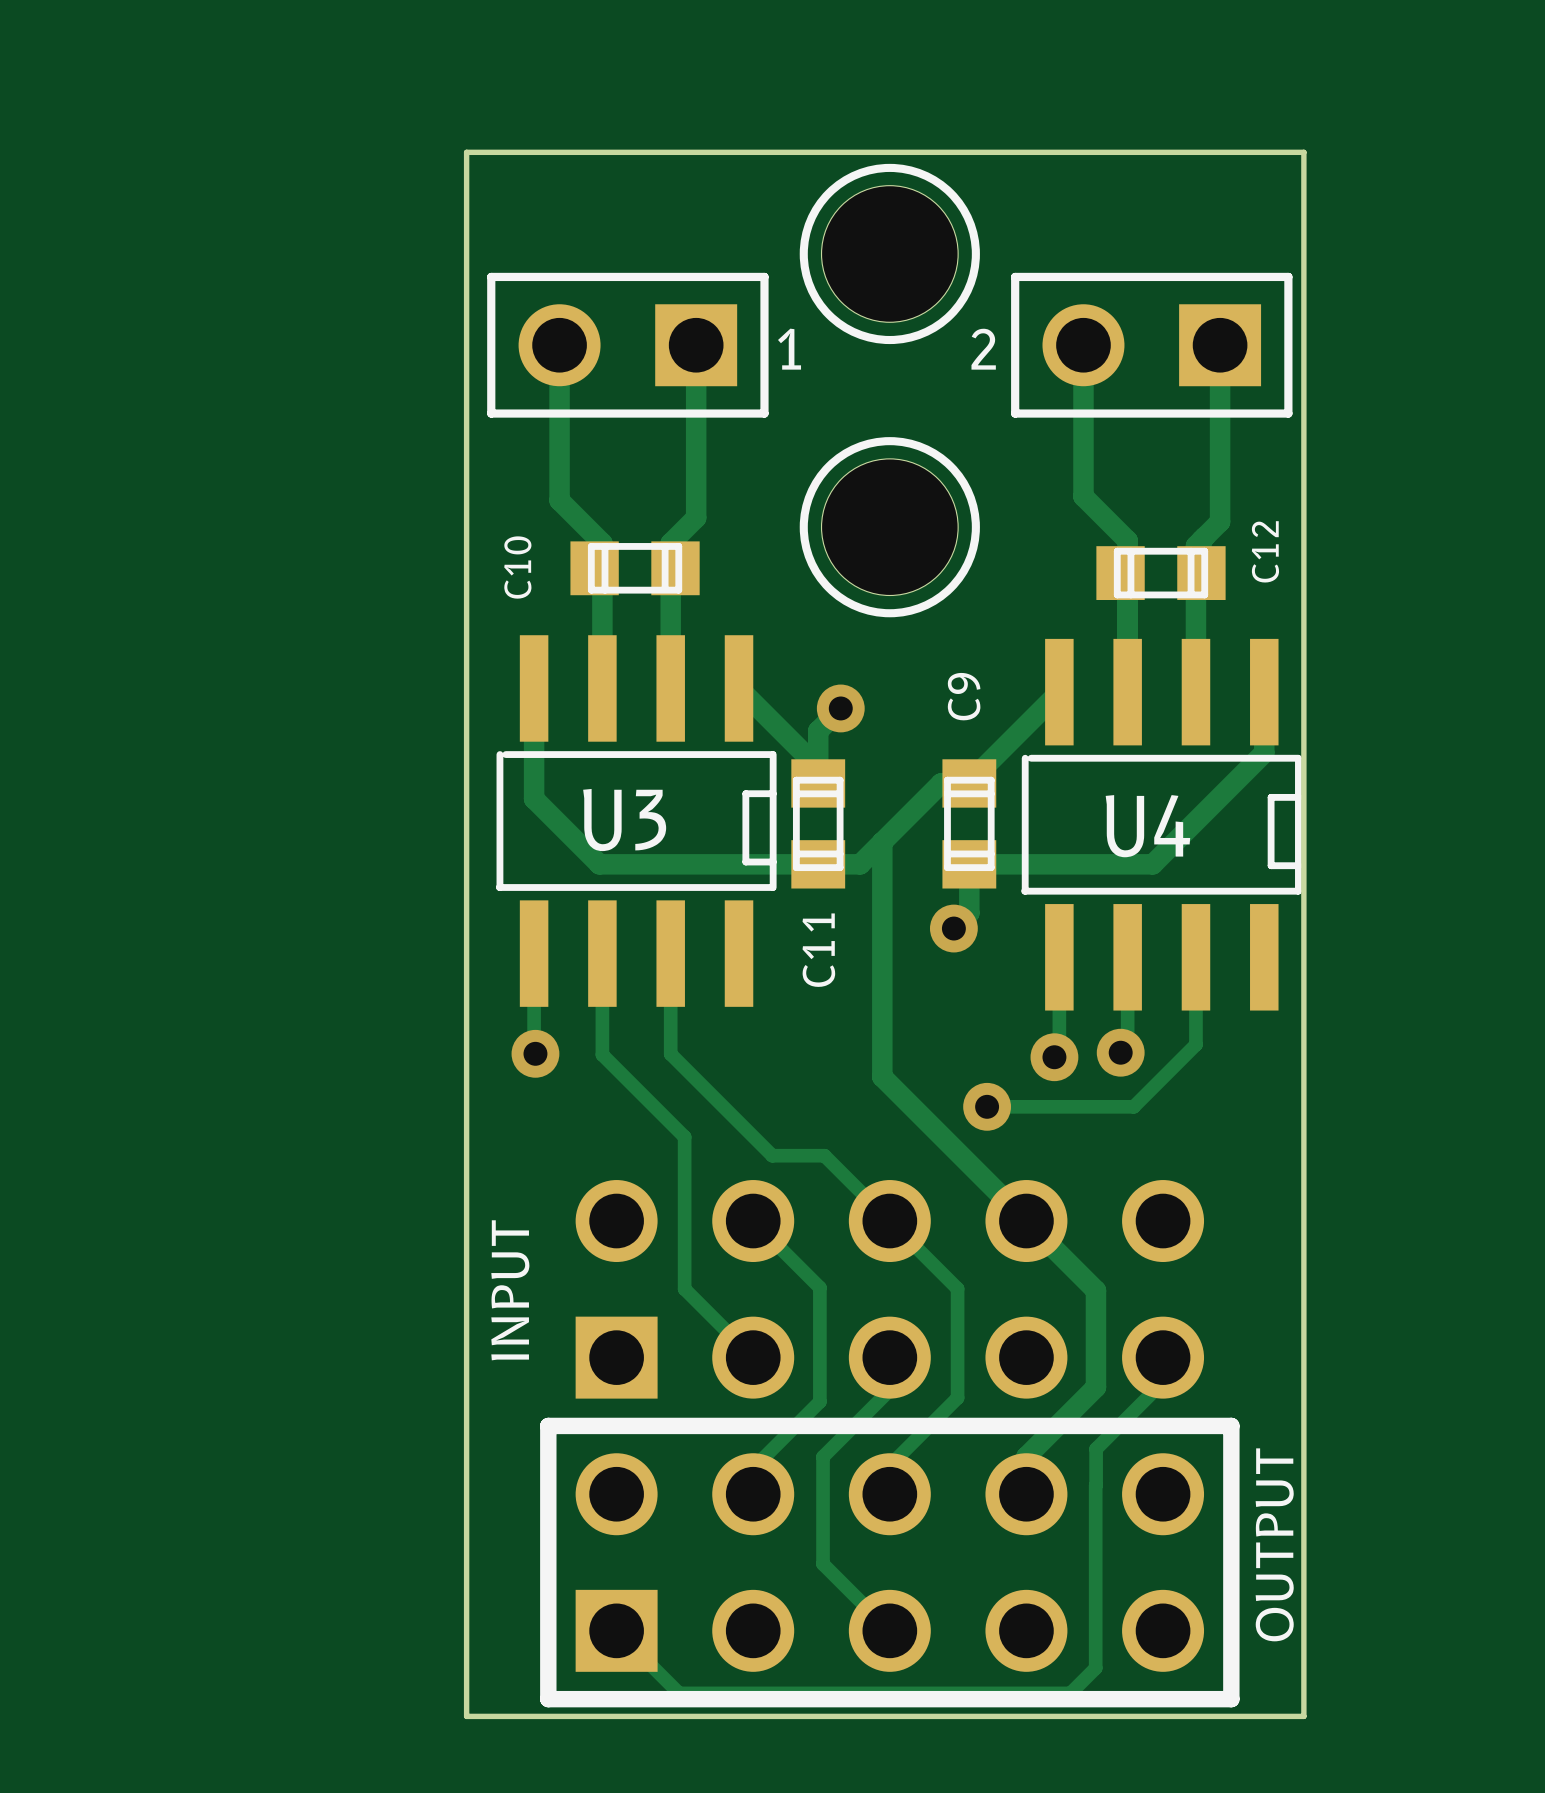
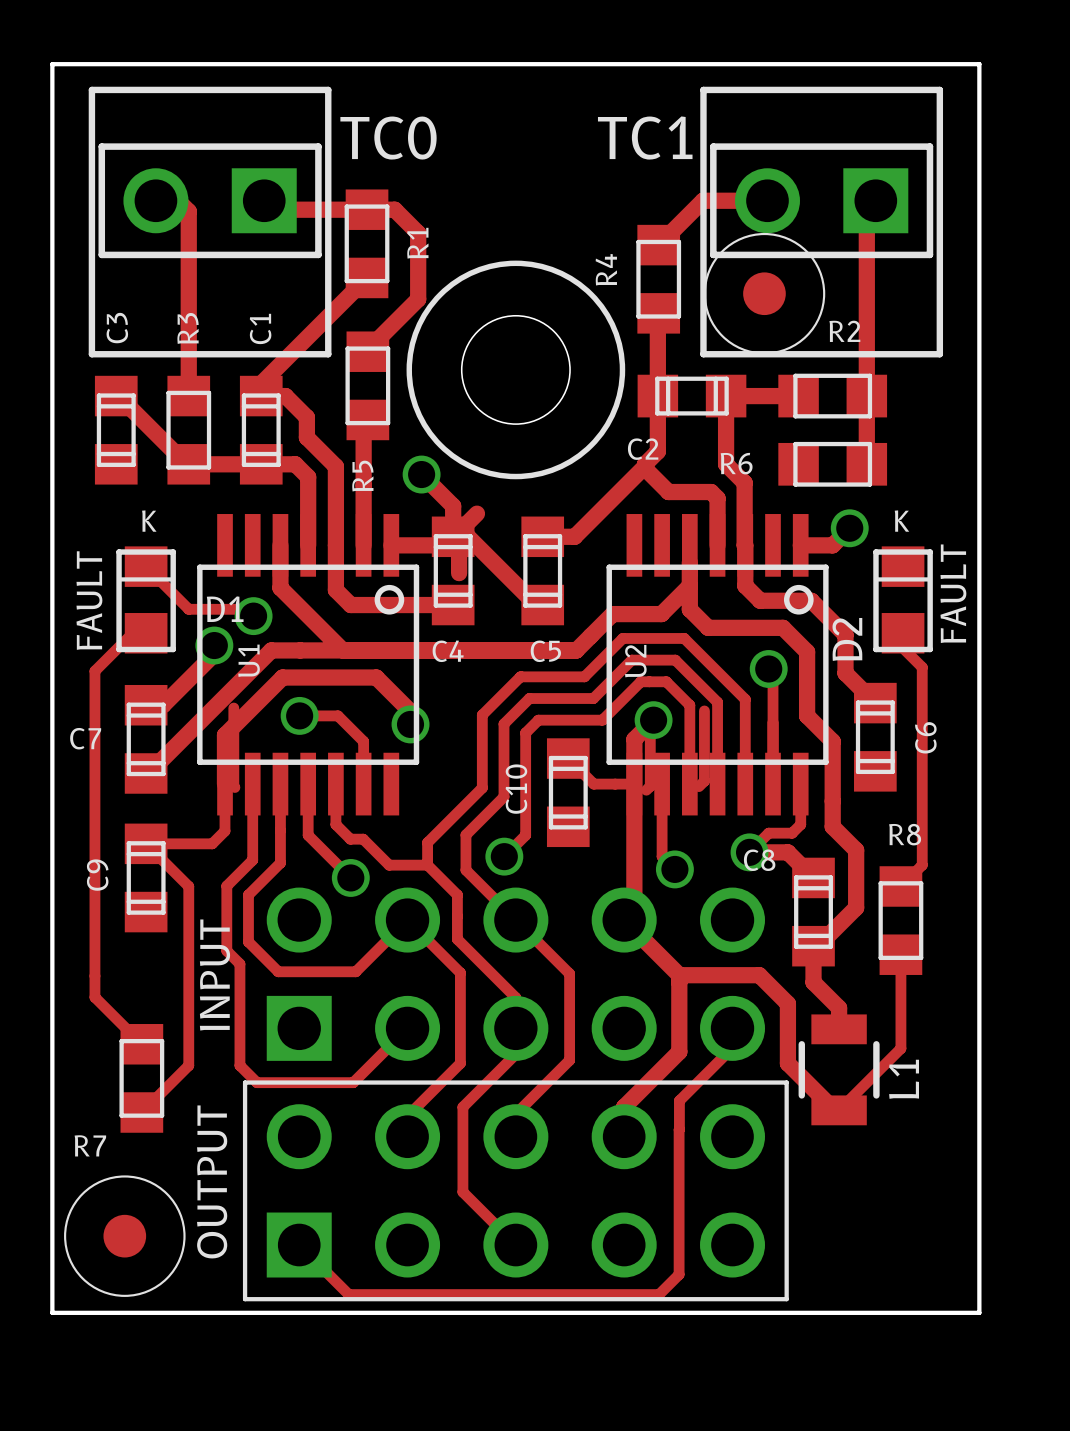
text: none -> TC0 (388, 138)
text: none -> TC1 (645, 137)
part: (889, 253) -> none
track: none -> (178, 200) (188, 211) (188, 396)
track: none -> (264, 200) (273, 209) (394, 209) (418, 233) (418, 299) (367, 351)
track: none -> (767, 200) (703, 200) (658, 245)
track: none -> (853, 200) (866, 213) (866, 464)
part: none -> (210, 222)
part: none -> (821, 222)
track: (559, 345) (559, 500) (602, 543) (602, 688) -> none
part: 1 (627, 345) -> none
track: (696, 345) (696, 517) (670, 543) (670, 688) -> none
track: (1083, 345) (1083, 496) (1127, 540) (1127, 692) -> none
part: 2 (1151, 345) -> none
track: (1220, 345) (1220, 521) (1195, 545) (1195, 692) -> none
R1: none -> (367, 243)
track: none -> (367, 277) (261, 383) (261, 396) (285, 396) (306, 417) (306, 437) (335, 466) (335, 590) (350, 605) (453, 605)
R4: none -> (658, 279)
part: none -> (764, 293)
track: none -> (658, 313) (657, 451) (645, 464) (645, 468) (668, 492) (711, 492) (717, 498) (717, 545)
part: (889, 527) -> none
C10 footprint: [570, 541, 700, 596] -> [546, 738, 590, 848]
R5: none -> (367, 385)
track: none -> (116, 396) (186, 464) (295, 464) (308, 477) (308, 545)
C2: none -> (691, 396)
track: none -> (798, 396) (726, 396) (726, 464) (744, 482) (744, 545)
R2: none -> (832, 396)
C12: (1160, 573) -> none
track: none -> (367, 419) (363, 424) (363, 545)
C3: none -> (116, 430)
R3: none -> (188, 430)
C1: none -> (261, 430)
R6: none -> (832, 464)
track: none -> (645, 466) (574, 536) (542, 536)
track: none -> (421, 474) (453, 506) (453, 536)
via: none -> (421, 474)
track: (534, 688) (534, 798) (599, 864) (860, 864) (941, 783) (969, 783) (1059, 692) -> none
track: (739, 688) (818, 767) -> none
track: (1264, 692) (1264, 752) (1152, 864) (969, 864) (969, 913) (953, 928) -> none
C9 name position: C9 (964, 696) -> C9 (97, 875)
via: (840, 708) -> none
track: none -> (849, 528) (832, 545) (800, 545)
via: none -> (849, 528)
track: none -> (453, 536) (468, 536) (536, 605) (542, 605)
track: none -> (453, 536) (444, 545) (391, 545)
track: none -> (280, 545) (280, 587) (342, 650)
track: none -> (745, 545) (745, 585) (760, 600) (811, 600) (845, 634) (845, 673) (875, 703)
C9 footprint: [942, 759, 997, 889] -> [124, 823, 168, 933]
track: none -> (689, 562) (689, 609) (708, 627) (783, 627) (807, 651) (807, 715) (832, 741) (832, 826) (856, 850) (856, 907) (817, 946) (813, 946) (813, 982) (839, 1008) (839, 1029)
track: none -> (146, 566) (188, 609) (246, 609) (253, 616)
C4: none -> (453, 570)
C5: none -> (542, 570)
track: none -> (689, 585) (661, 614) (612, 614) (576, 650) (271, 650) (148, 773) (146, 773)
D1: none -> FAULT (146, 599)
D2: none -> FAULT (903, 599)
U3: (636, 821) -> none
C11: (818, 823) -> none
U4: (1161, 824) -> none
via: none -> (253, 616)
track: (882, 842) (882, 1076) (1026, 1221) -> (653, 720) (634, 739) (634, 909) (624, 920)
track: none -> (146, 633) (132, 633) (94, 671) (94, 997) (141, 1044)
track: none -> (888, 633) (922, 667) (922, 865) (900, 886)
track: none -> (214, 645) (214, 654) (163, 705) (146, 705)
via: none -> (214, 645)
U1: none -> (308, 664)
U2: none -> (717, 664)
track: none -> (768, 668) (773, 673) (773, 784)
via: none -> (768, 668)
via: (953, 928) -> none
track: (602, 953) (602, 1054) (684, 1137) (684, 1289) (753, 1357) -> (252, 784) (252, 860) (226, 886) (226, 950) (239, 964) (239, 1065) (257, 1082) (353, 1082) (407, 1028)
track: (670, 953) (670, 1054) (772, 1155) (824, 1155) (826, 1158) -> (717, 784) (717, 702) (675, 660) (631, 660) (593, 698) (529, 698) (503, 723) (503, 796) (465, 834) (465, 870)
track: (1195, 957) (1195, 1044) (1133, 1106) (987, 1106) -> none
track: none -> (299, 715) (338, 715) (363, 741) (363, 784)
via: none -> (299, 715)
via: none -> (653, 720)
track: none -> (410, 724) (410, 711) (376, 677) (282, 677) (224, 735) (224, 831) (212, 843) (146, 843) (188, 886) (188, 1065) (141, 1112)
via: none -> (410, 724)
C6: none -> (875, 737)
C7: none -> (146, 739)
track: none -> (568, 758) (593, 784) (634, 784)
part: none -> OUTPUT (515, 780)
track: none -> (280, 784) (280, 863) (248, 895) (248, 941) (278, 971) (355, 971) (407, 920)
track: none -> (308, 784) (308, 835) (350, 877)
track: none -> (335, 784) (335, 824) (350, 839) (363, 839) (389, 865) (427, 865)
track: none -> (662, 784) (662, 856) (674, 869)
track: none -> (689, 784) (689, 705) (666, 681) (640, 681) (602, 720) (538, 720) (525, 732) (525, 835) (504, 856)
track: none -> (745, 784) (745, 699) (684, 638) (622, 638) (584, 676) (520, 676) (482, 715) (482, 787) (427, 842) (427, 865)
track: none -> (800, 784) (800, 824) (792, 833) (768, 833) (749, 852) (787, 852) (813, 877)
via: (1120, 1052) -> none
via: (535, 1053) -> none
via: (1054, 1057) -> none
via: (987, 1106) -> none
via: none -> (749, 852)
via: none -> (504, 856)
track: none -> (427, 865) (457, 895) (457, 939) (515, 997) (515, 1028)
via: none -> (674, 869)
via: none -> (350, 877)
C8: none -> (813, 912)
R8: none -> (900, 920)
track: none -> (900, 954) (900, 1048) (839, 1110) (834, 1110) (787, 1063) (787, 1003) (759, 975) (679, 975)
L1: none -> (839, 1069)
R7: none -> (141, 1078)
part: OUTPUT (889, 1562) -> none
part: none -> (124, 1236)
board edge: (466, 1716) (466, 152) (1303, 152) (1303, 1716) -> (180, 1312) (52, 1312) (52, 64) (979, 64) (979, 1312) (844, 1312)

